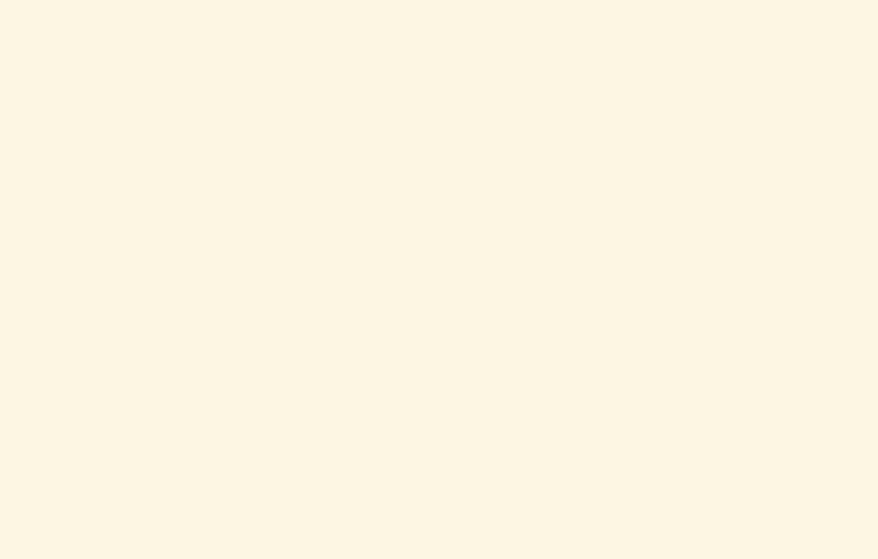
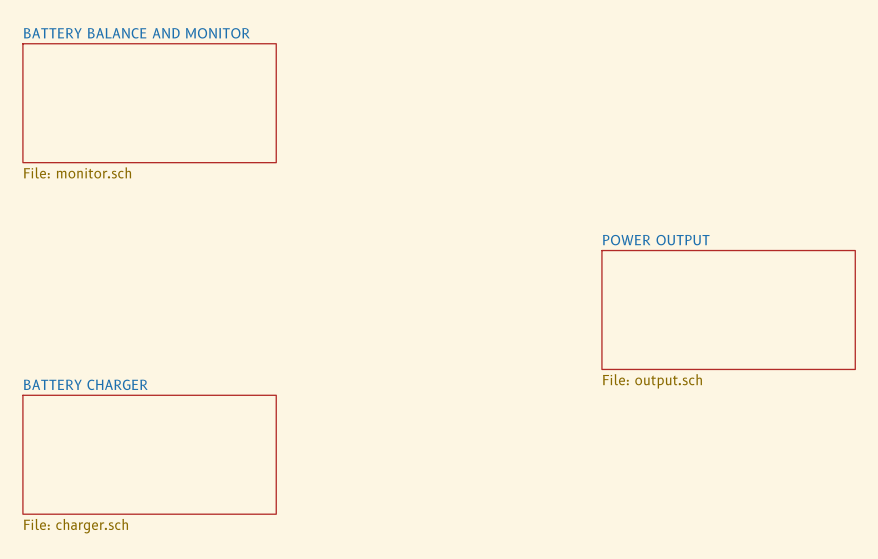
sheet BATTERY BALANCE AND MONITOR: none -> File: monitor.sch (149, 103)
sheet POWER OUTPUT: none -> File: output.sch (728, 309)
sheet BATTERY CHARGER: none -> File: charger.sch (149, 454)

